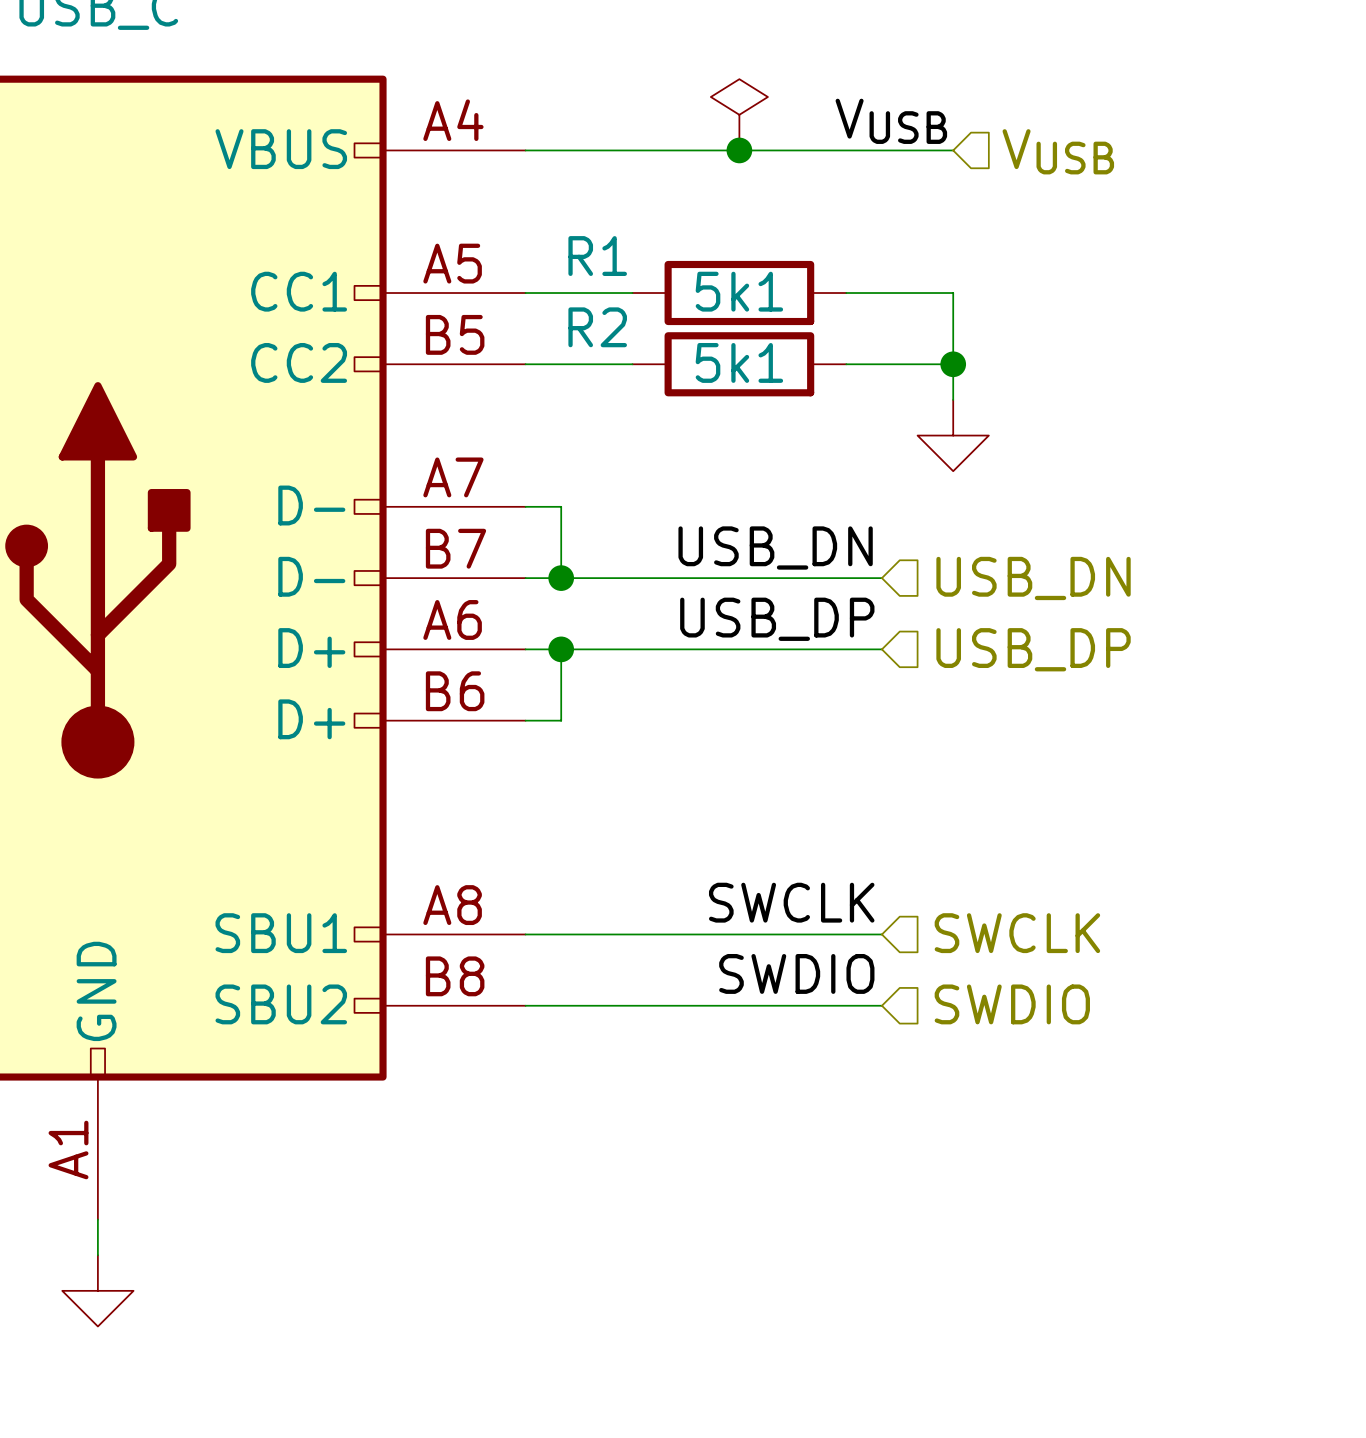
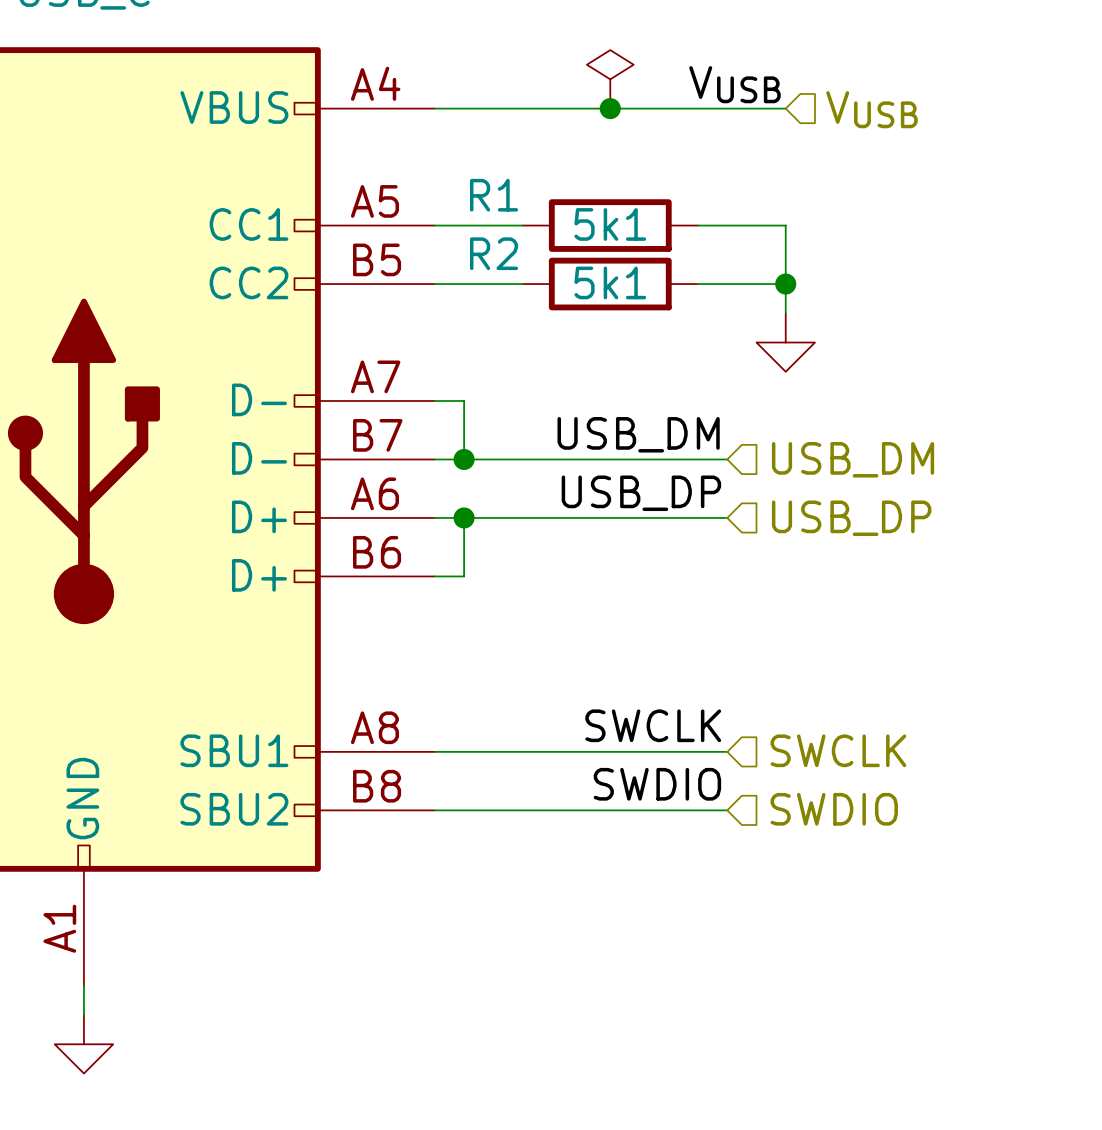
label: USB_DN (775, 548) -> USB_DM (638, 434)
hierarchical label: USB_DN (1033, 578) -> USB_DM (853, 459)

